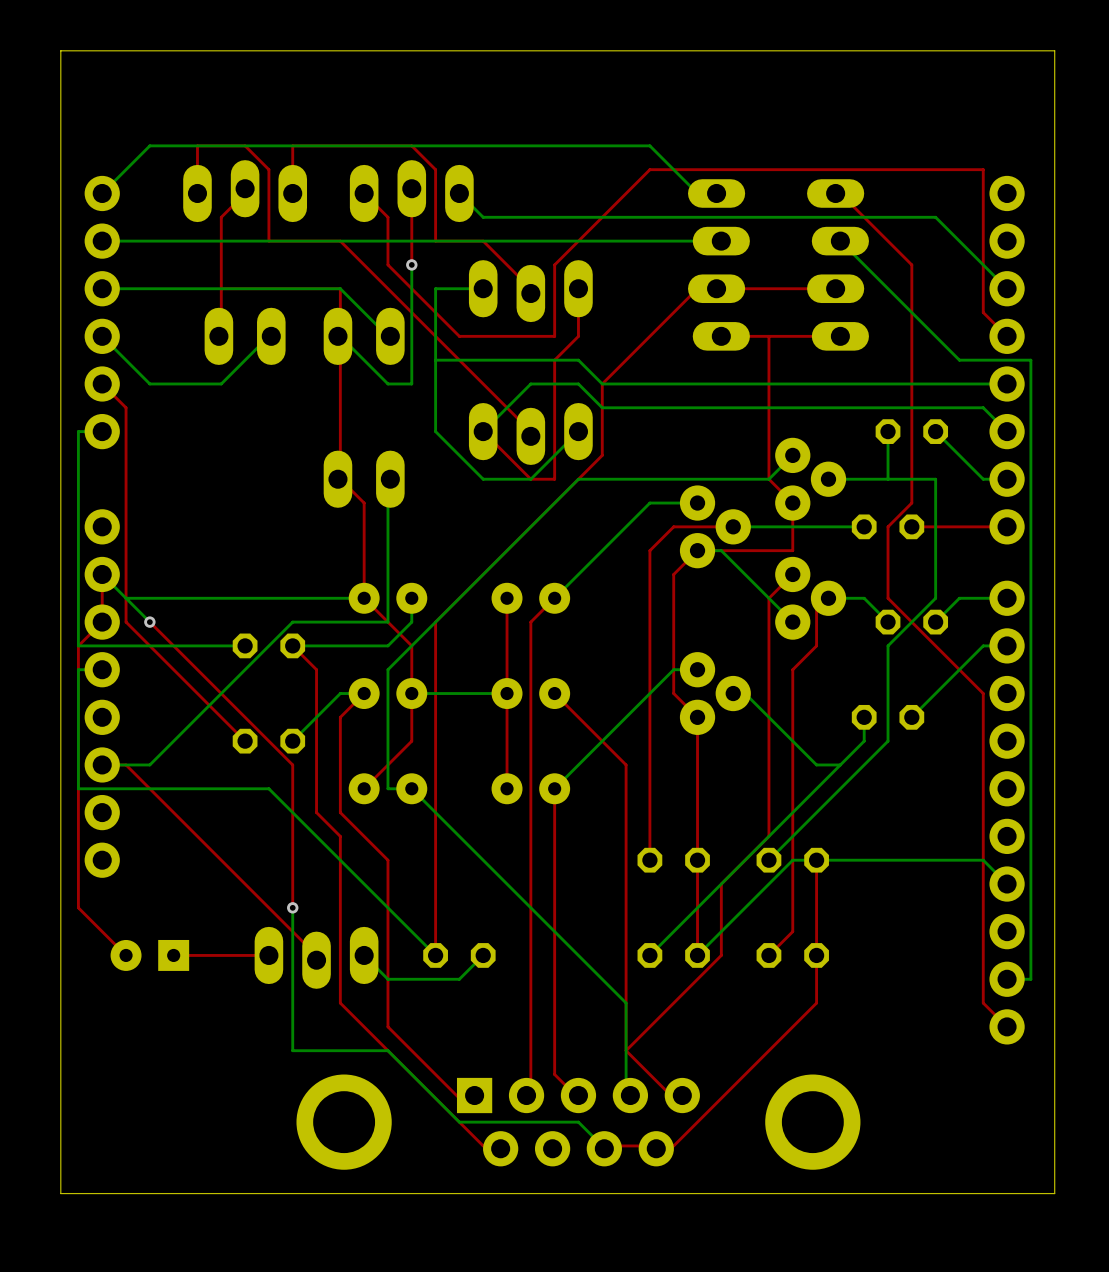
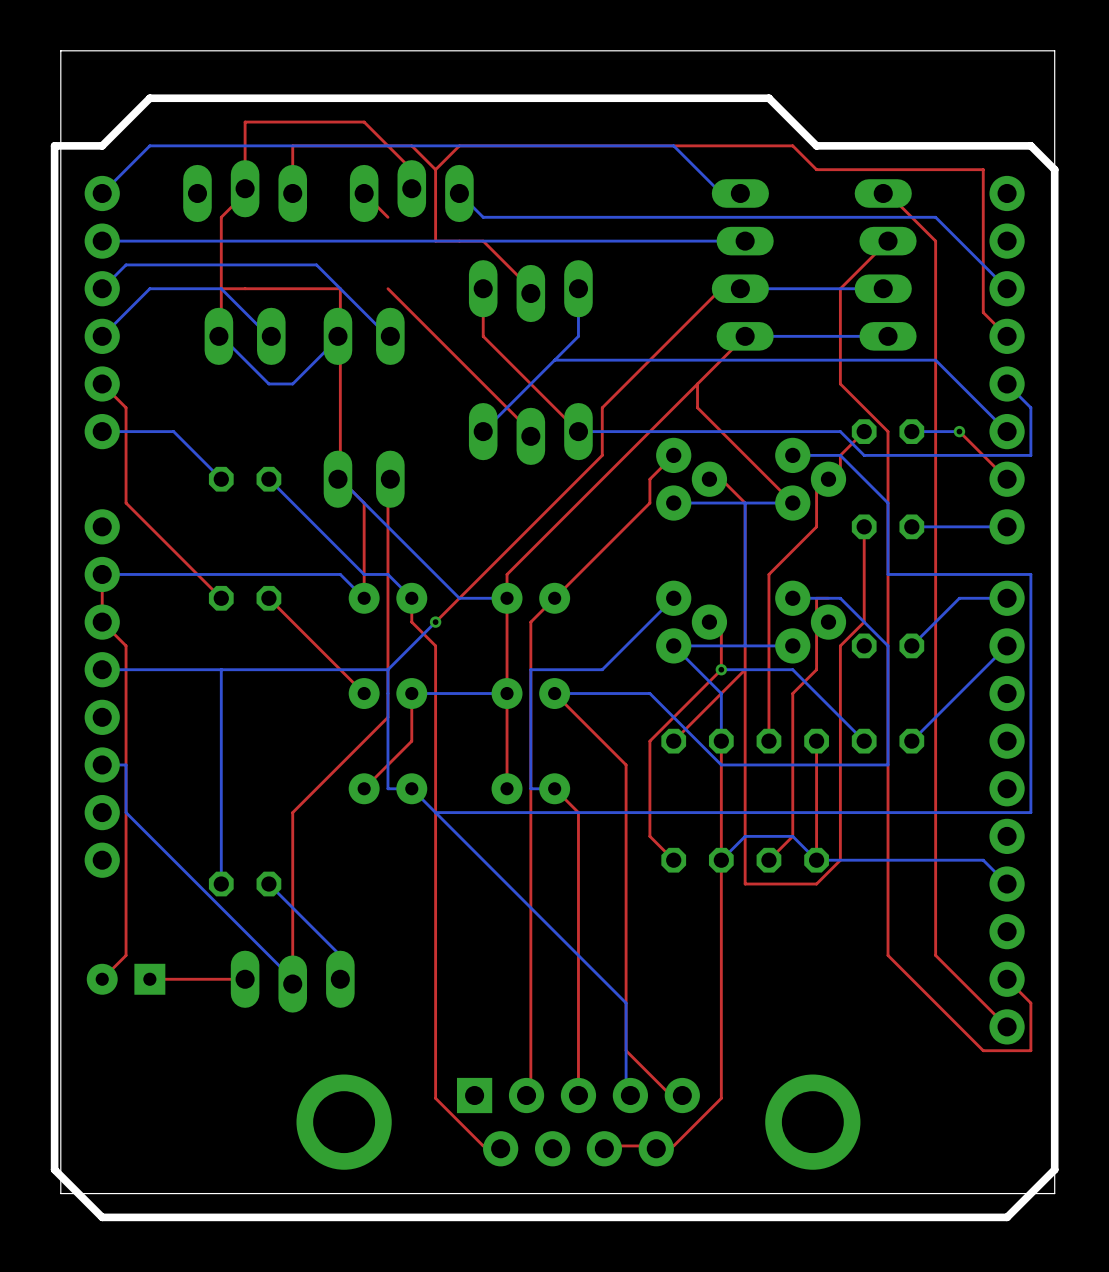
bottom track: (649, 145) (697, 193) (716, 193) -> (649, 145) (673, 145) (721, 193) (740, 193)
top track: (816, 169) (649, 169) (554, 264) (554, 336) (459, 336) (387, 264) (387, 217) -> (816, 169) (792, 145) (459, 145) (435, 169)
board edge: none -> (1054, 169) (1030, 145) (816, 145) (768, 98) (149, 98) (102, 145) (54, 145) (54, 1169) (102, 1217) (1007, 1217) (1054, 1169)
board edge width: thin (1054, 169) (1054, 1169) -> thick (1054, 169) (1054, 1169)
top track: (411, 188) (411, 264) -> (411, 188) (411, 169) (364, 122) (245, 122) (245, 188)
top track: (197, 193) (197, 145) (245, 145) (268, 169) (268, 241) (340, 241) (387, 288) -> none
top track: (835, 193) (840, 193) (911, 264) (911, 503) (888, 526) -> (888, 241) (840, 288) (840, 383) (888, 431) (888, 526)
top track: none -> (883, 193) (888, 193) (935, 241) (935, 955) (983, 1003)
bottom track: (840, 241) (959, 360) (1030, 360) (1030, 407) -> (1007, 383) (1030, 407)
bottom track: (411, 264) (411, 383) (387, 383) (340, 336) -> (218, 336) (221, 336) (268, 383) (292, 383) (340, 336)
via: (411, 264) -> none
part position: (718, 264) -> (742, 264)
part: (838, 264) -> none
part: none -> (885, 264)
bottom track: (149, 288) (102, 288) -> (149, 288) (102, 336)
bottom track: (340, 288) (221, 288) -> (268, 336) (221, 288)
bottom track: none -> (340, 288) (316, 264) (126, 264) (102, 288)
bottom track: (483, 288) (435, 288) (435, 431) (483, 479) (530, 479) (578, 431) -> (1030, 455) (864, 455) (840, 431) (578, 431)
top track: none -> (483, 288) (483, 336) (578, 431)
top track: (578, 288) (578, 336) (554, 360) (554, 479) (530, 479) (483, 431) -> none
top track: (721, 288) (697, 288) (602, 383) (602, 407) -> (721, 288) (602, 407)
top track: (835, 288) (740, 288) -> none
bottom track: none -> (883, 288) (740, 288)
bottom track: (268, 336) (221, 383) (149, 383) (102, 336) -> none
top track: none -> (745, 336) (507, 574) (507, 598)
top track: (768, 336) (768, 479) -> (697, 383) (697, 407) (768, 479)
top track: (840, 336) (721, 336) -> none
bottom track: none -> (888, 336) (745, 336)
bottom track: (554, 360) (435, 360) -> none
bottom track: (578, 360) (602, 383) (1007, 383) -> (578, 360) (935, 360) (983, 407)
bottom track: (530, 383) (578, 383) (602, 407) (983, 407) -> (530, 383) (578, 336) (578, 288)
bottom track: (102, 431) (78, 431) (78, 645) (245, 645) -> (102, 431) (173, 431) (221, 479)
bottom track: (888, 431) (888, 479) -> none
part position: (911, 431) -> (888, 431)
bottom track: (935, 431) (983, 479) (1007, 479) -> none
bottom track: none -> (959, 431) (911, 431)
top track: none -> (959, 431) (1007, 479)
via: none -> (959, 431)
top track: none -> (673, 455) (649, 479) (649, 503) (554, 598)
bottom track: (792, 455) (768, 479) (578, 479) (435, 622) -> none
bottom track: (1030, 455) (1030, 574) -> (792, 455) (840, 455) (888, 503) (888, 574) (1030, 574)
part: none -> (245, 479)
bottom track: none -> (337, 479) (340, 479) (459, 598) (507, 598)
bottom track: (390, 479) (387, 479) (387, 622) (292, 622) (149, 764) (126, 764) -> none
part: none -> (691, 479)
top track: none -> (709, 479) (721, 479) (745, 503) (745, 884) (816, 884) (840, 860) (840, 645) (864, 622) (864, 526)
bottom track: (828, 479) (935, 479) (935, 598) (888, 645) -> none
top track: (126, 503) (126, 622) (245, 741) -> (126, 503) (221, 598)
bottom track: (673, 503) (649, 503) (554, 598) -> none
bottom track: none -> (745, 503) (745, 645)
bottom track: none -> (792, 503) (697, 503)
top track: (792, 503) (792, 550) (697, 550) (673, 574) (673, 693) (697, 717) (697, 955) -> none
part: (715, 526) -> none
top track: (733, 526) (673, 526) (649, 550) (649, 741) -> (709, 622) (721, 622) (721, 669) (649, 741)
bottom track: (864, 526) (733, 526) -> none
bottom track: none -> (1007, 526) (911, 526)
top track: (1007, 526) (911, 526) -> none
bottom track: (697, 550) (721, 550) (792, 622) -> none
bottom track: (102, 574) (149, 622) -> none
top track: (792, 574) (768, 598) -> (864, 431) (840, 455) (840, 479) (816, 479) (816, 526) (768, 574) (768, 598)
bottom track: (364, 598) (126, 598) -> (364, 598) (340, 574) (102, 574)
top track: (364, 598) (411, 645) (411, 693) -> none
bottom track: (411, 598) (411, 622) (387, 645) (292, 645) -> (411, 598) (387, 574) (364, 574) (268, 479)
part position: (810, 598) -> (810, 622)
bottom track: none -> (828, 598) (792, 598)
bottom track: (840, 598) (864, 598) (888, 622) -> (840, 598) (888, 645)
top track: (888, 598) (983, 693) (983, 1003) -> (888, 598) (888, 955) (983, 1050) (1030, 1050) (1030, 1003) (1007, 979)
top track: (102, 622) (78, 645) (78, 907) (126, 955) -> (102, 622) (126, 645) (126, 955) (102, 979)
top track: (149, 622) (292, 764) (292, 812) -> (390, 479) (387, 479) (387, 717) (292, 812)
via: (149, 622) -> none
top track: (435, 622) (435, 645) -> (411, 598) (411, 622) (435, 645)
via: none -> (435, 622)
part: none -> (691, 622)
part position: (911, 622) -> (888, 645)
bottom track: none -> (935, 622) (911, 645)
part position: (268, 645) -> (245, 598)
top track: (292, 645) (316, 669) (316, 812) (340, 836) (340, 1003) (435, 1098) -> (435, 955) (435, 1098)
bottom track: none -> (792, 645) (673, 645) (721, 693) (721, 741)
top track: (816, 645) (792, 669) (792, 693) -> (816, 645) (816, 669) (792, 693)
bottom track: (1007, 645) (983, 645) (911, 717) -> (1007, 645) (911, 741)
bottom track: (102, 669) (78, 669) (78, 788) (268, 788) (435, 955) -> (102, 669) (387, 669)
bottom track: none -> (221, 669) (221, 884)
bottom track: (697, 669) (673, 669) (554, 788) -> (673, 598) (602, 669) (530, 669) (530, 788) (554, 788)
bottom track: none -> (721, 669) (792, 669) (864, 741)
via: none -> (721, 669)
top track: none -> (745, 669) (673, 741)
bottom track: (364, 693) (340, 693) (292, 741) -> none
top track: (364, 693) (340, 717) (340, 812) (387, 860) (387, 1026) (459, 1098) (474, 1095) -> (364, 693) (268, 598)
part: (715, 693) -> none
bottom track: (733, 693) (745, 693) (816, 764) -> (554, 693) (649, 693) (721, 764) (816, 764)
bottom track: (864, 717) (864, 741) (649, 955) -> none
part position: (888, 717) -> (888, 741)
part: (268, 741) -> none
part: none -> (697, 741)
top track: (768, 741) (768, 836) (721, 884) -> (721, 741) (721, 884)
part: none -> (792, 741)
bottom track: (888, 741) (768, 860) -> (888, 741) (888, 764) (840, 764)
top track: (102, 764) (126, 764) (316, 955) (316, 960) -> none
top track: (554, 788) (554, 1074) (578, 1098) -> (554, 788) (578, 812) (578, 1095)
bottom track: (1030, 812) (1030, 979) (1007, 979) -> (1030, 812) (435, 812)
top track: (649, 836) (649, 860) -> (649, 836) (673, 860)
top track: (792, 836) (792, 931) (768, 955) -> (792, 836) (768, 860)
part position: (673, 860) -> (697, 860)
bottom track: (816, 860) (792, 860) (697, 955) -> (816, 860) (792, 836) (745, 836) (721, 860)
top track: (816, 860) (816, 1003) (721, 1098) -> (816, 860) (816, 741)
part: none -> (245, 884)
bottom track: none -> (268, 884) (340, 955) (340, 979)
bottom track: (292, 907) (292, 979) -> (126, 764) (126, 812) (292, 979)
top track: none -> (292, 907) (292, 984)
via: (292, 907) -> none
part position: (149, 955) -> (126, 979)
top track: (268, 955) (173, 955) -> (245, 979) (149, 979)
part: (459, 955) -> none
bottom track: (483, 955) (459, 979) (387, 979) (364, 955) -> none
part: (673, 955) -> none
top track: (721, 955) (626, 1050) -> (721, 955) (721, 1098)
part: (792, 955) -> none
part position: (316, 957) -> (292, 981)
bottom track: (292, 984) (292, 1050) (387, 1050) (459, 1122) (578, 1122) (604, 1148) -> none

